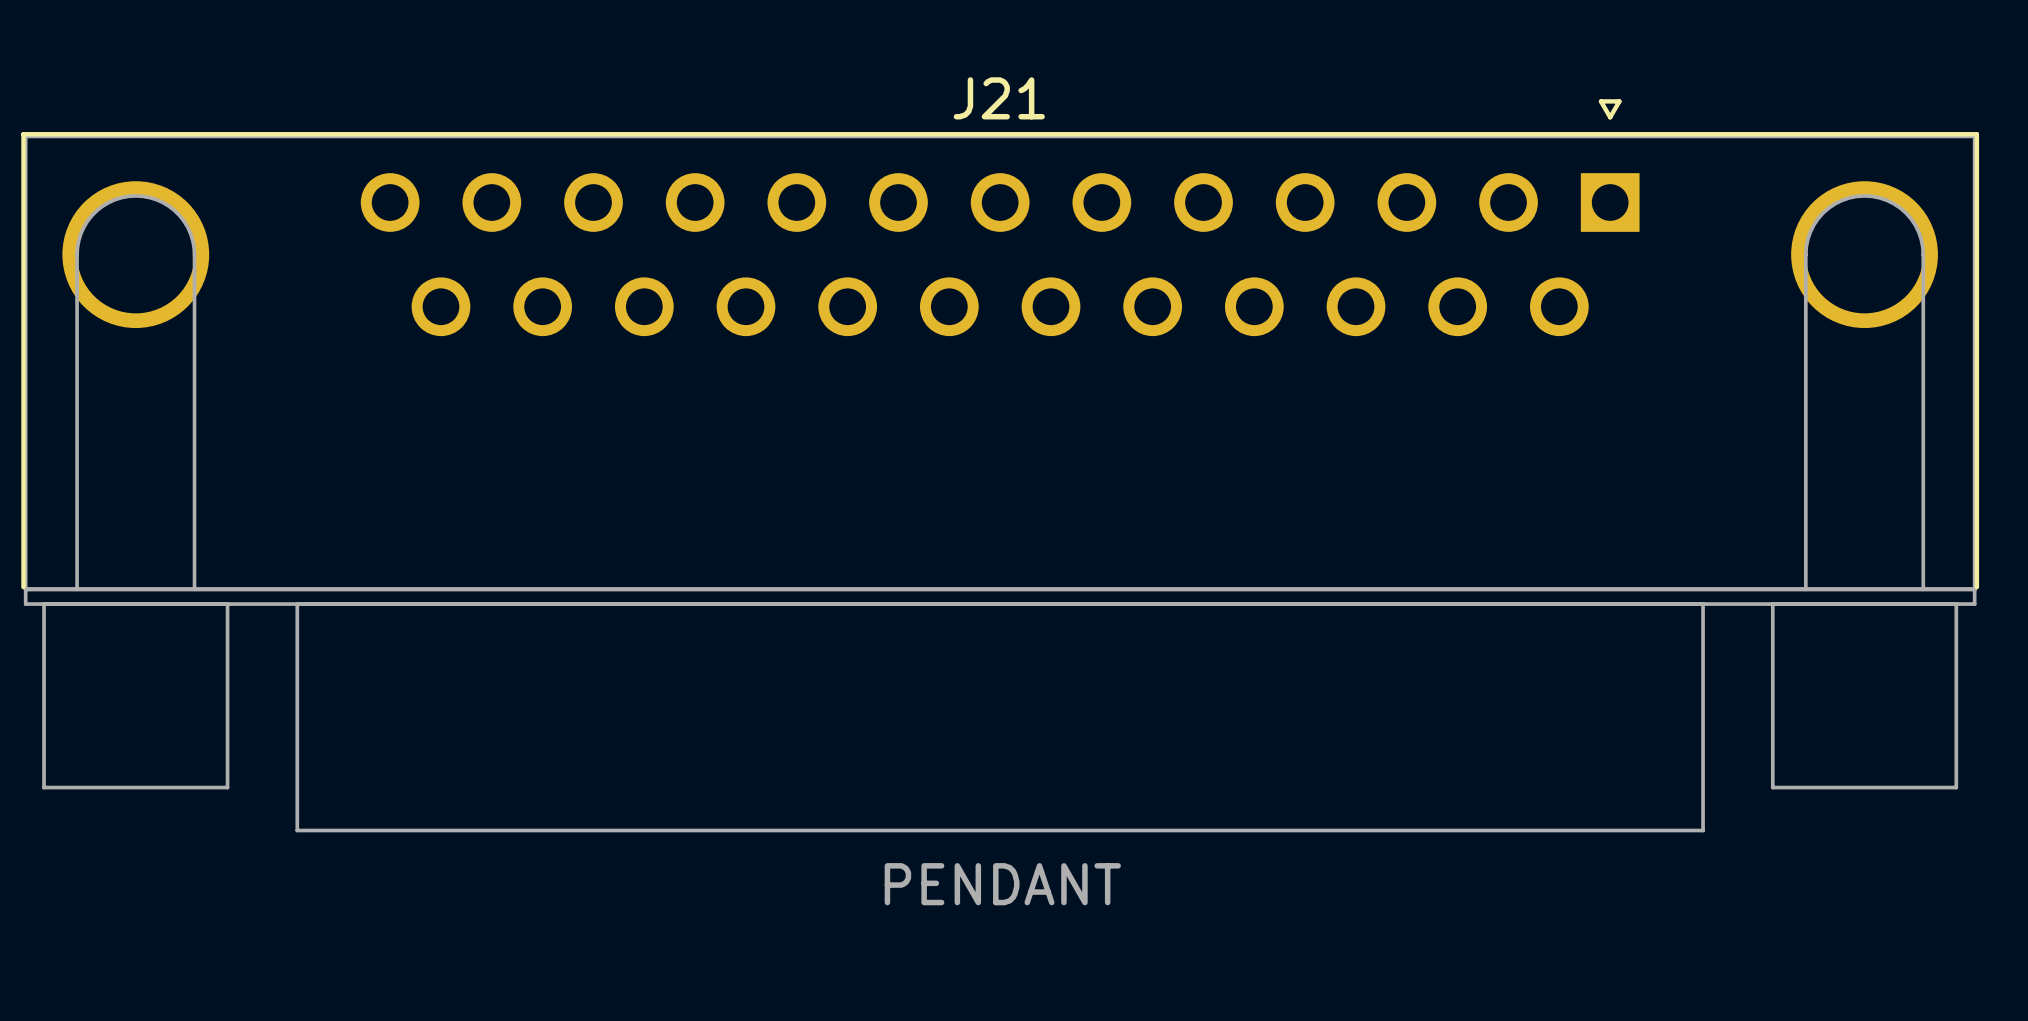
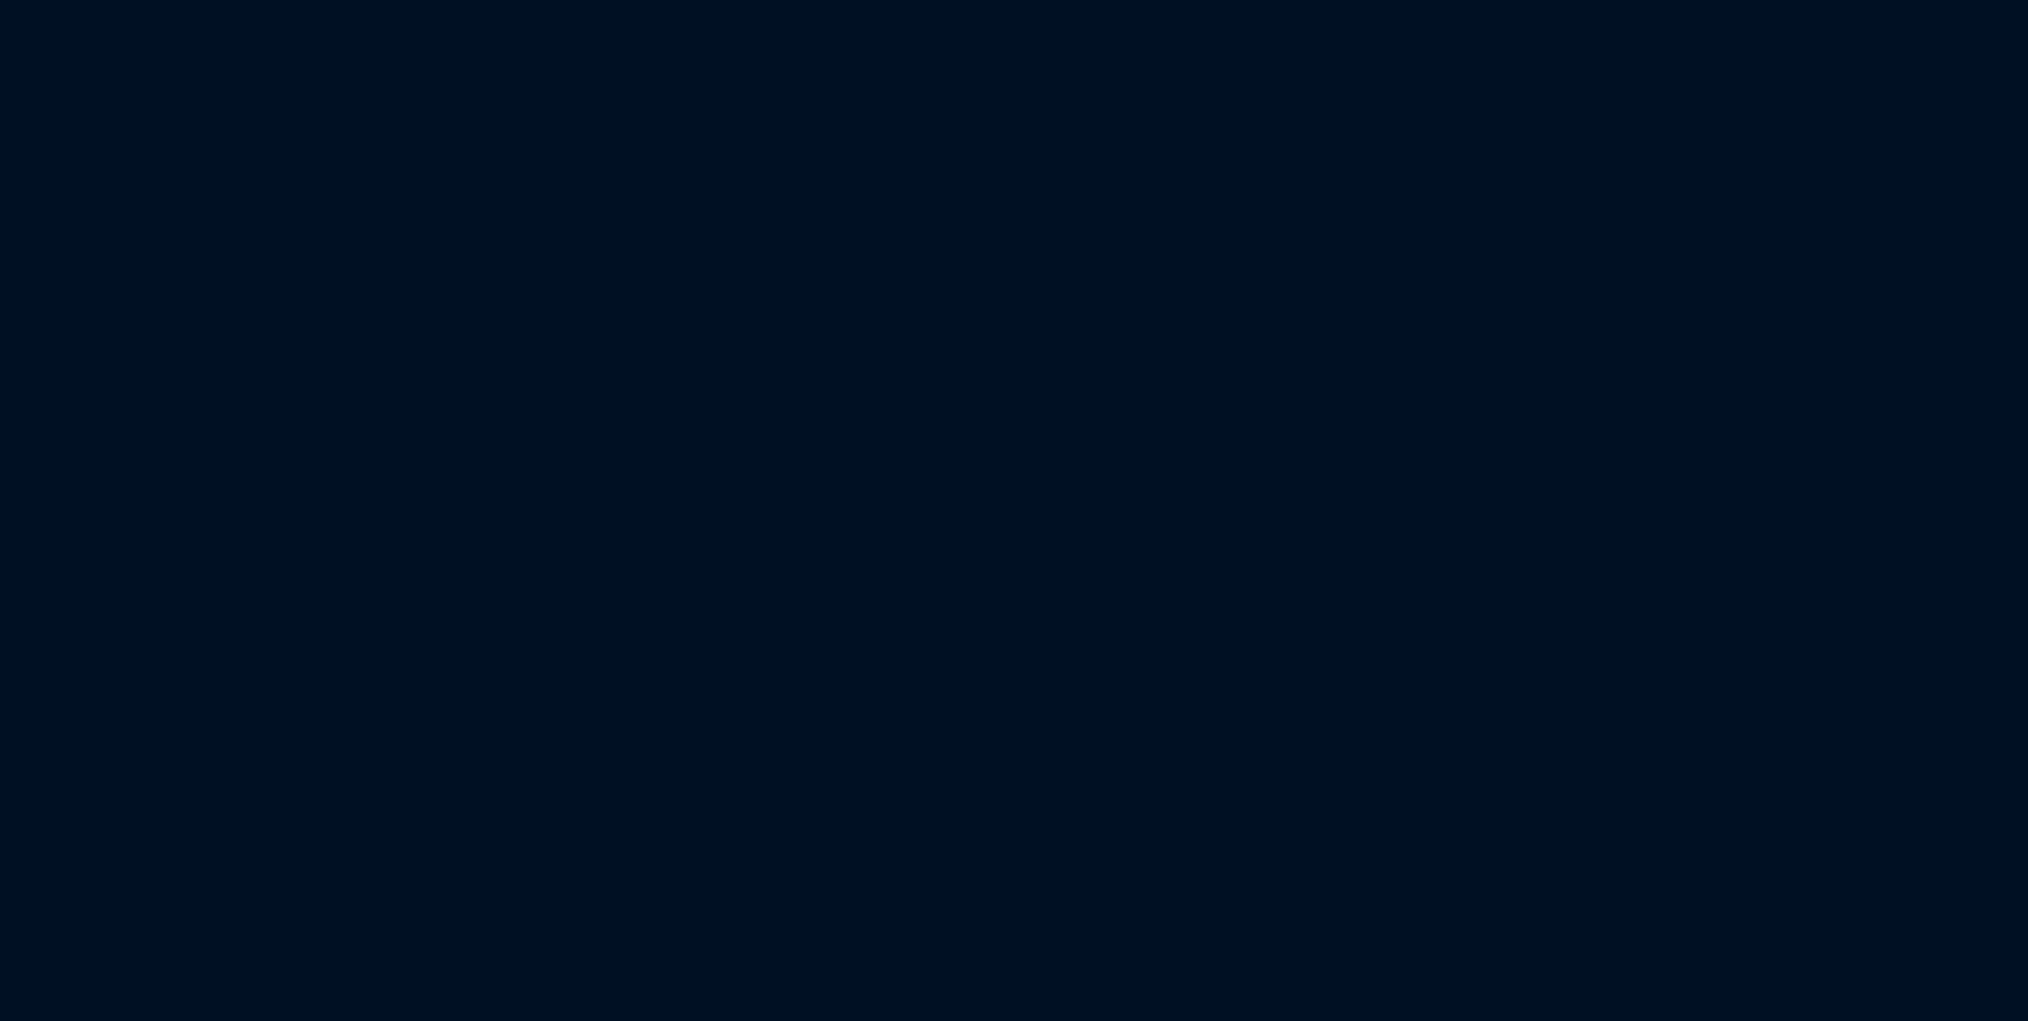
J21: PENDANT (1000, 465) -> none

